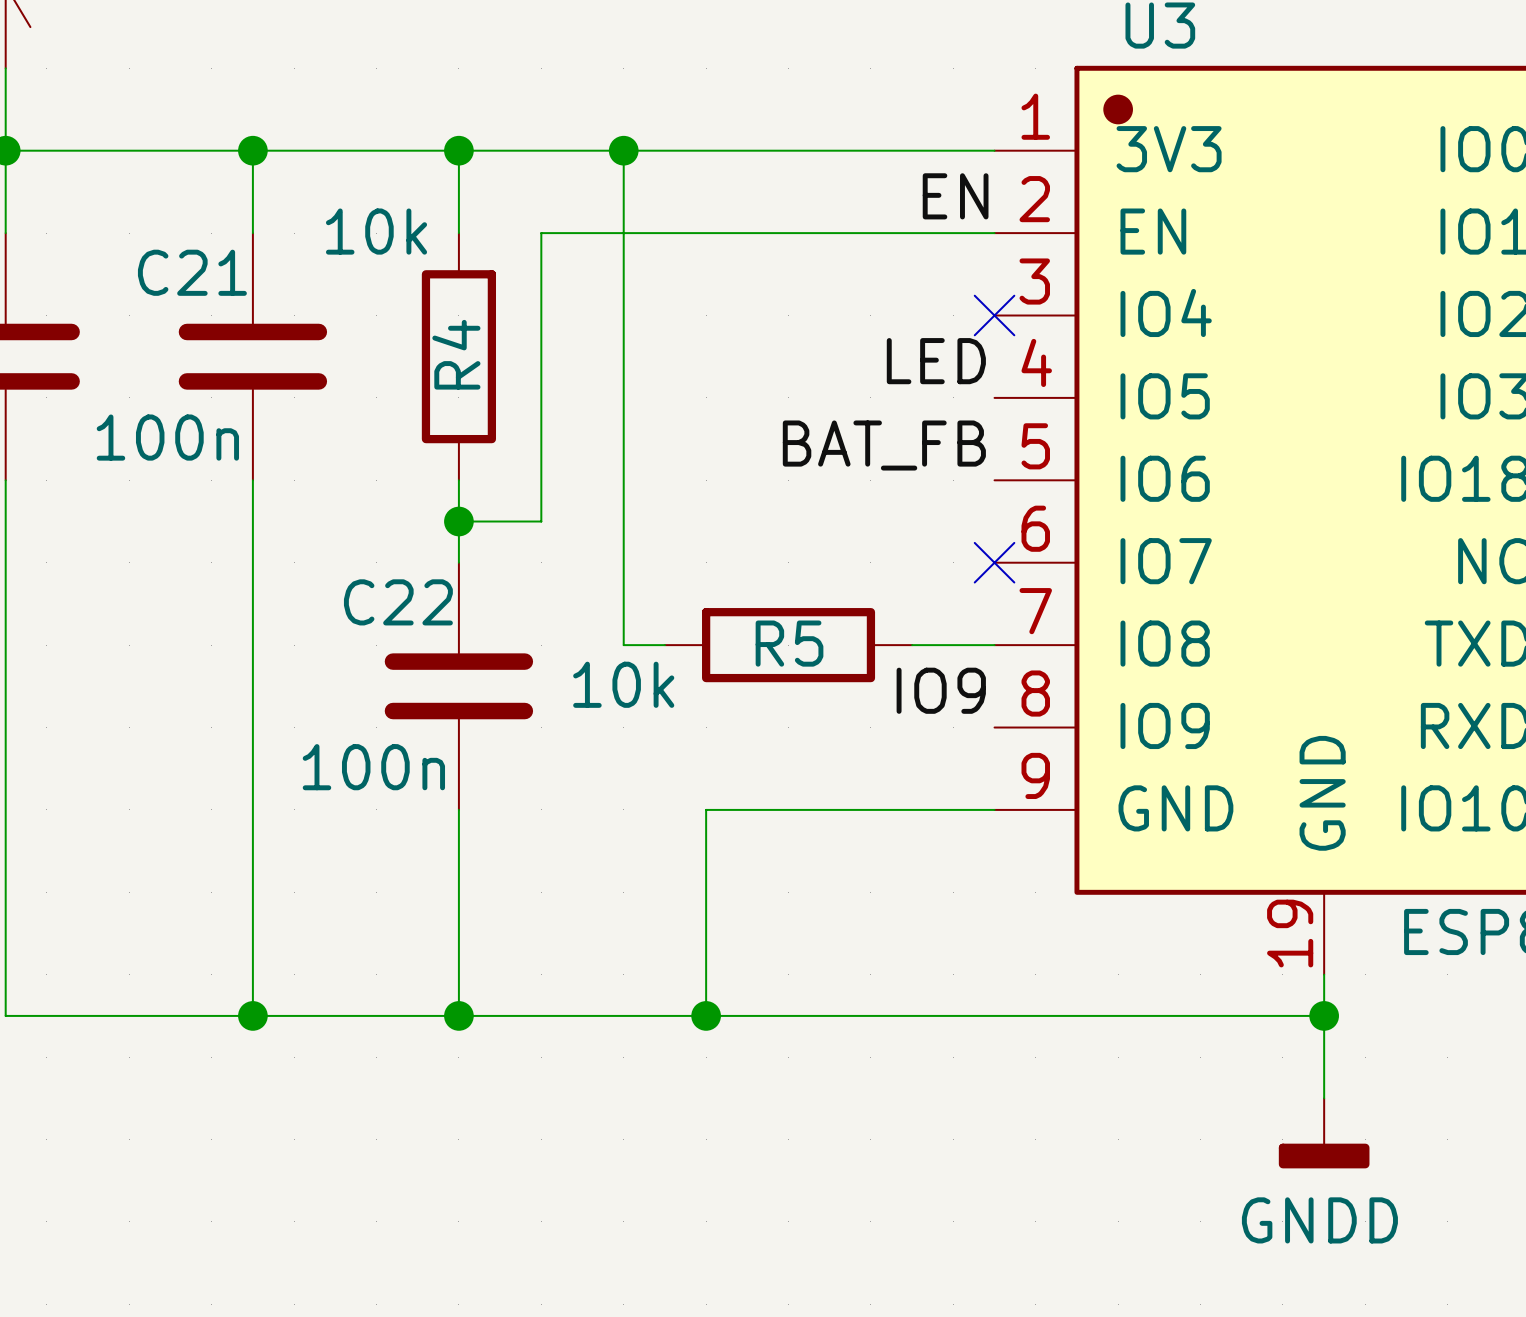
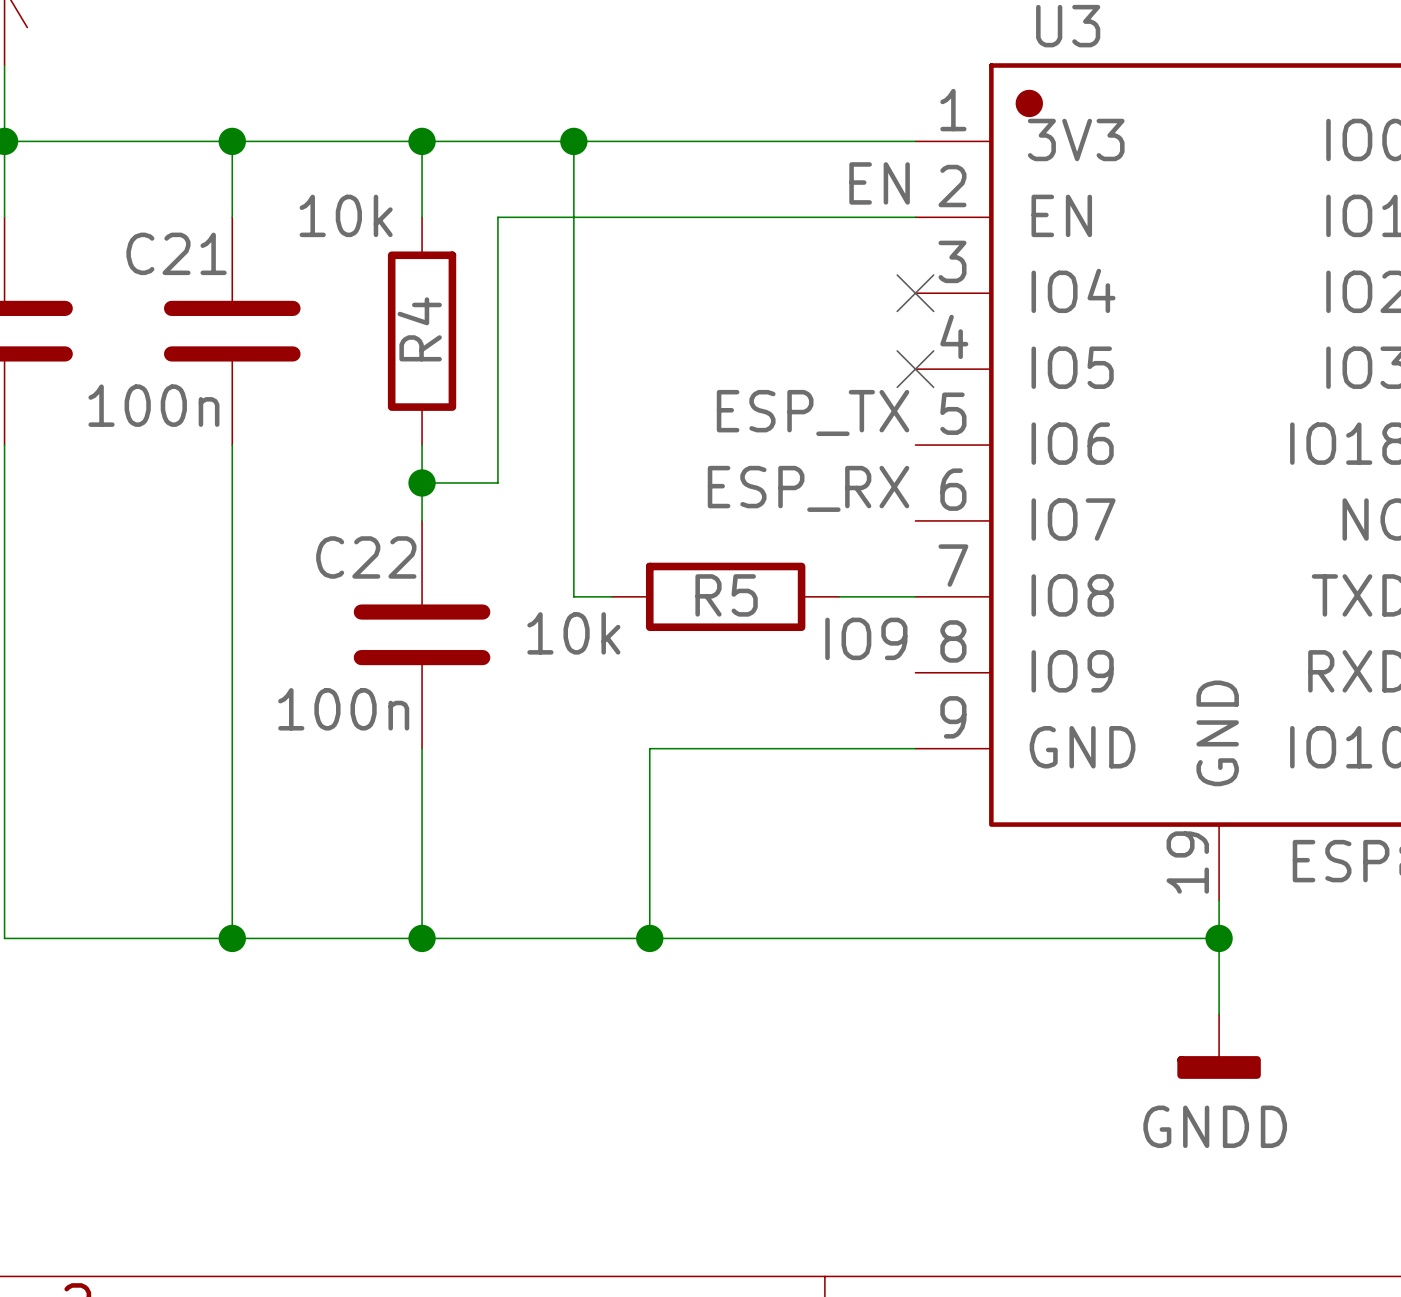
label: LED (936, 361) -> none
label: BAT_FB (884, 445) -> ESP_TX (813, 412)
label: none -> ESP_RX (808, 488)
no-connect mark position: (994, 562) -> (915, 369)

